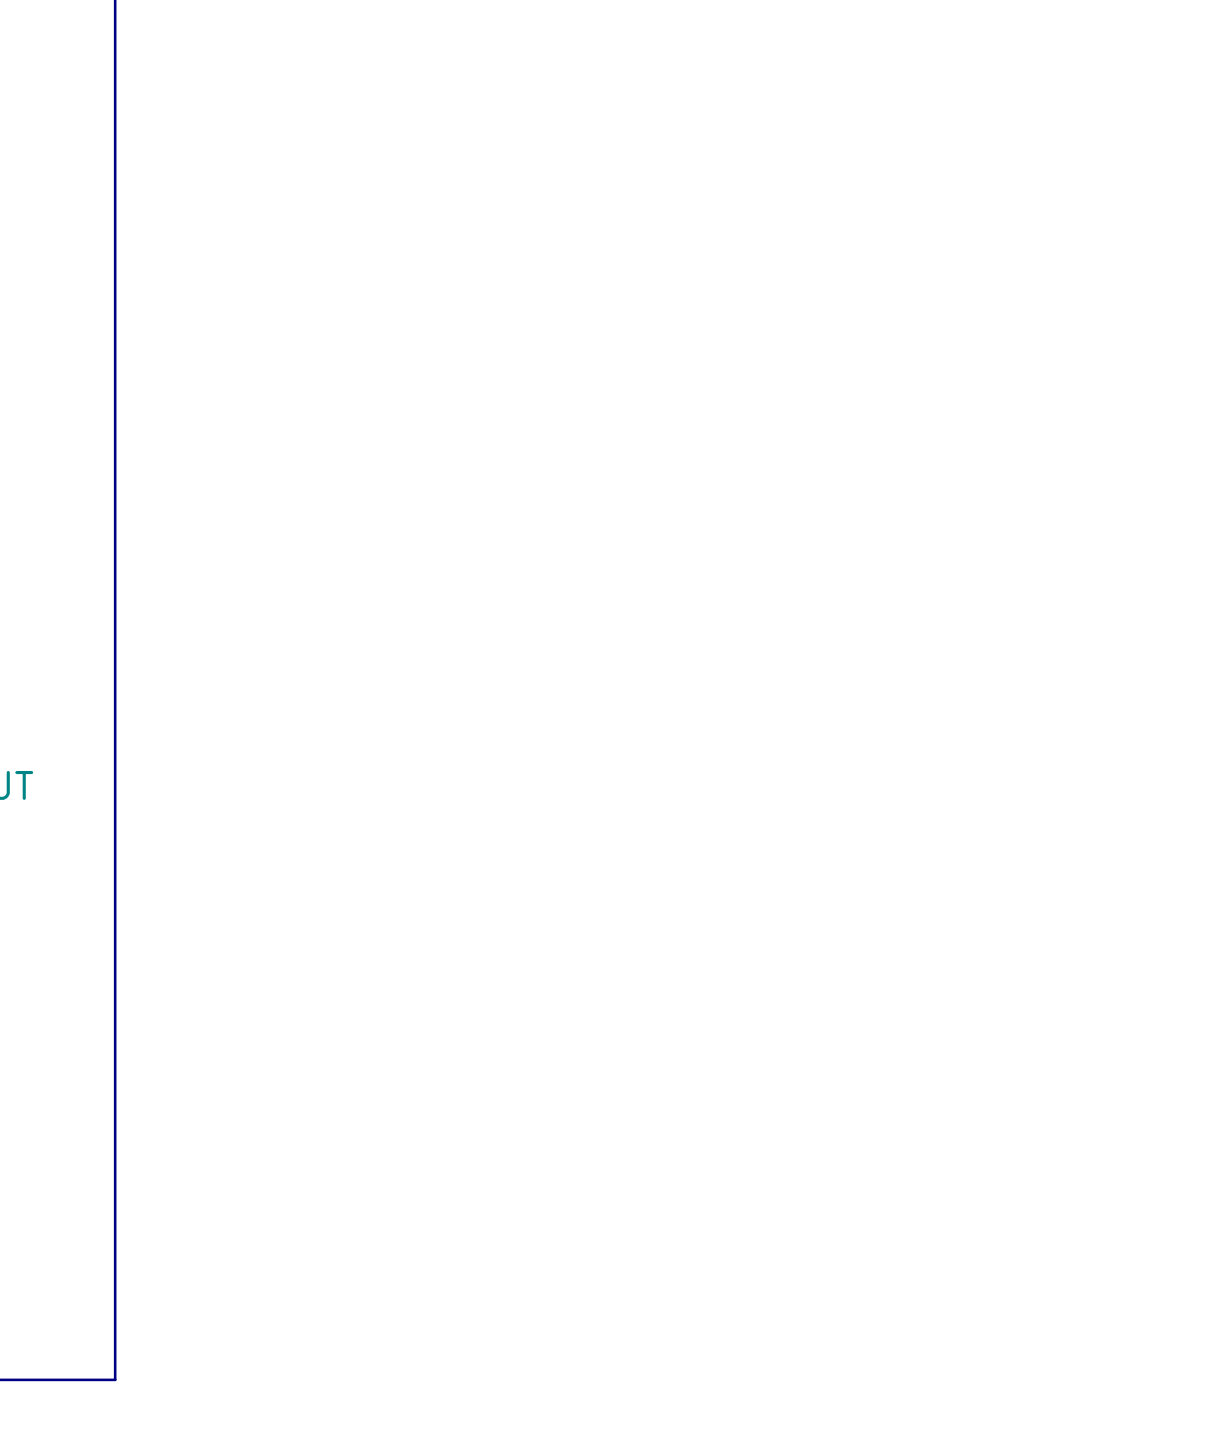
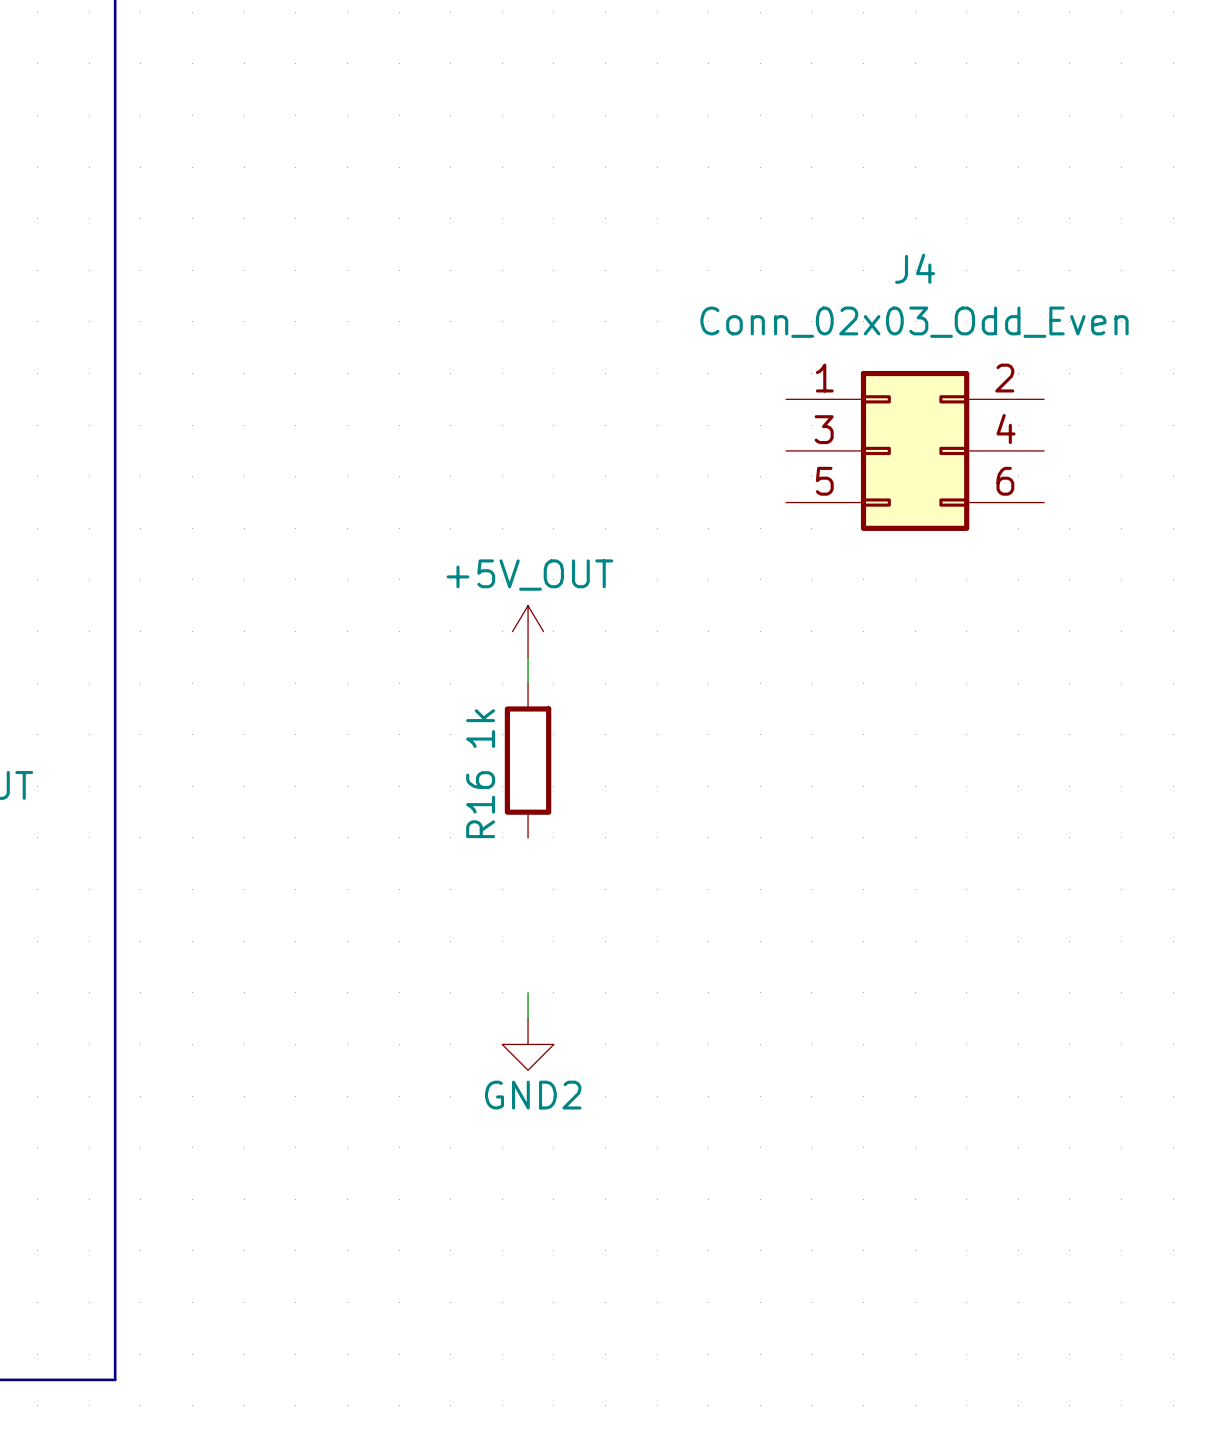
J4: none -> Conn_02x03_Odd_Even (915, 450)
power symbol: none -> +5V_OUT (528, 631)
wire: none -> (528, 657) (528, 683)
R16: none -> 1k (528, 760)
wire: none -> (528, 992) (528, 1018)
power symbol: none -> GND2 (528, 1044)

